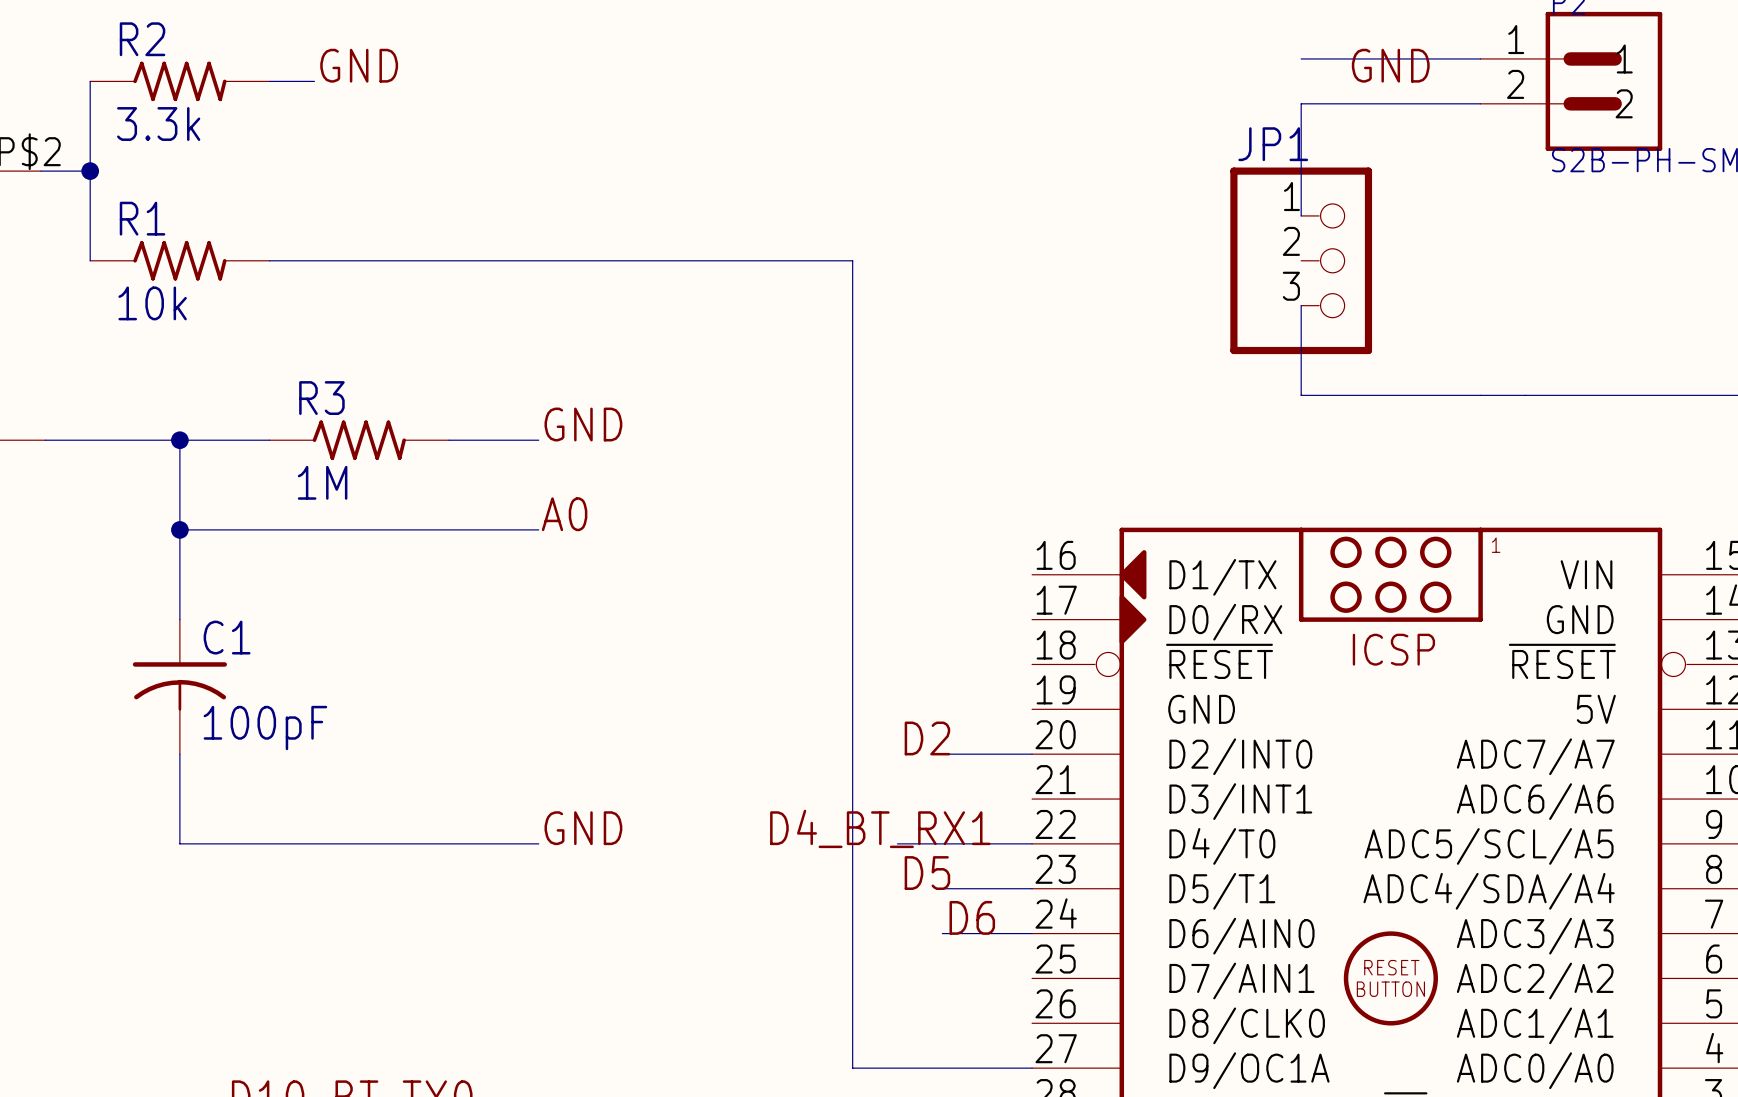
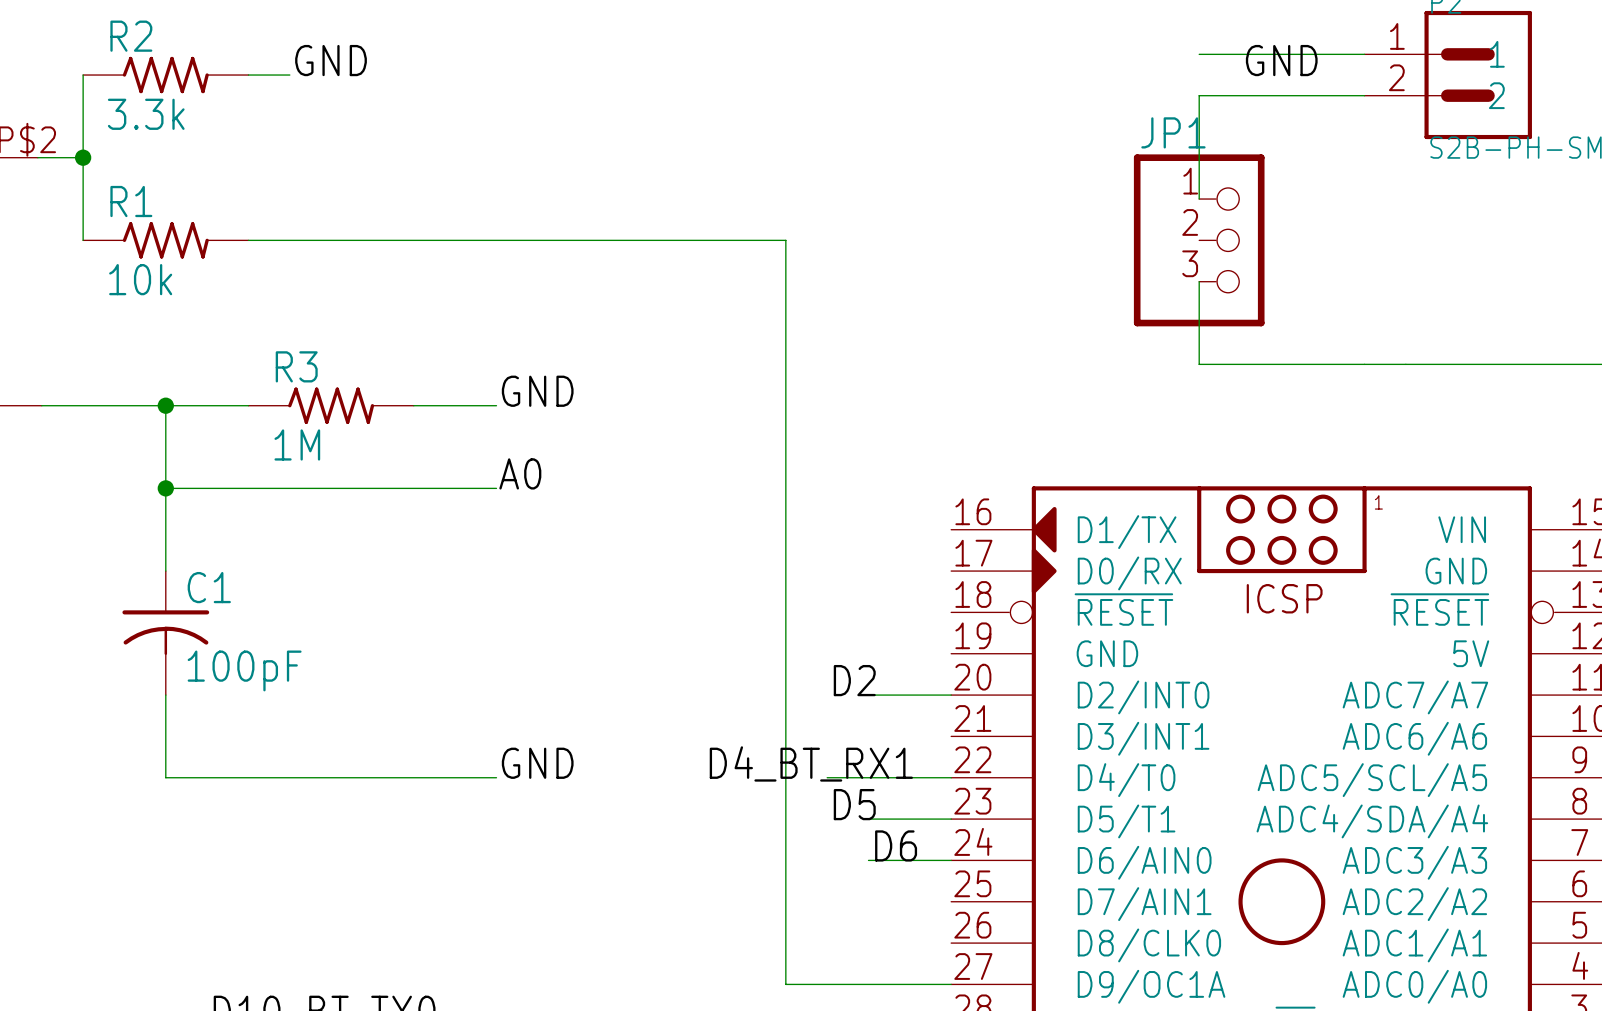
part text: RESET (1391, 967) -> none
part text: BUTTON (1390, 989) -> none

